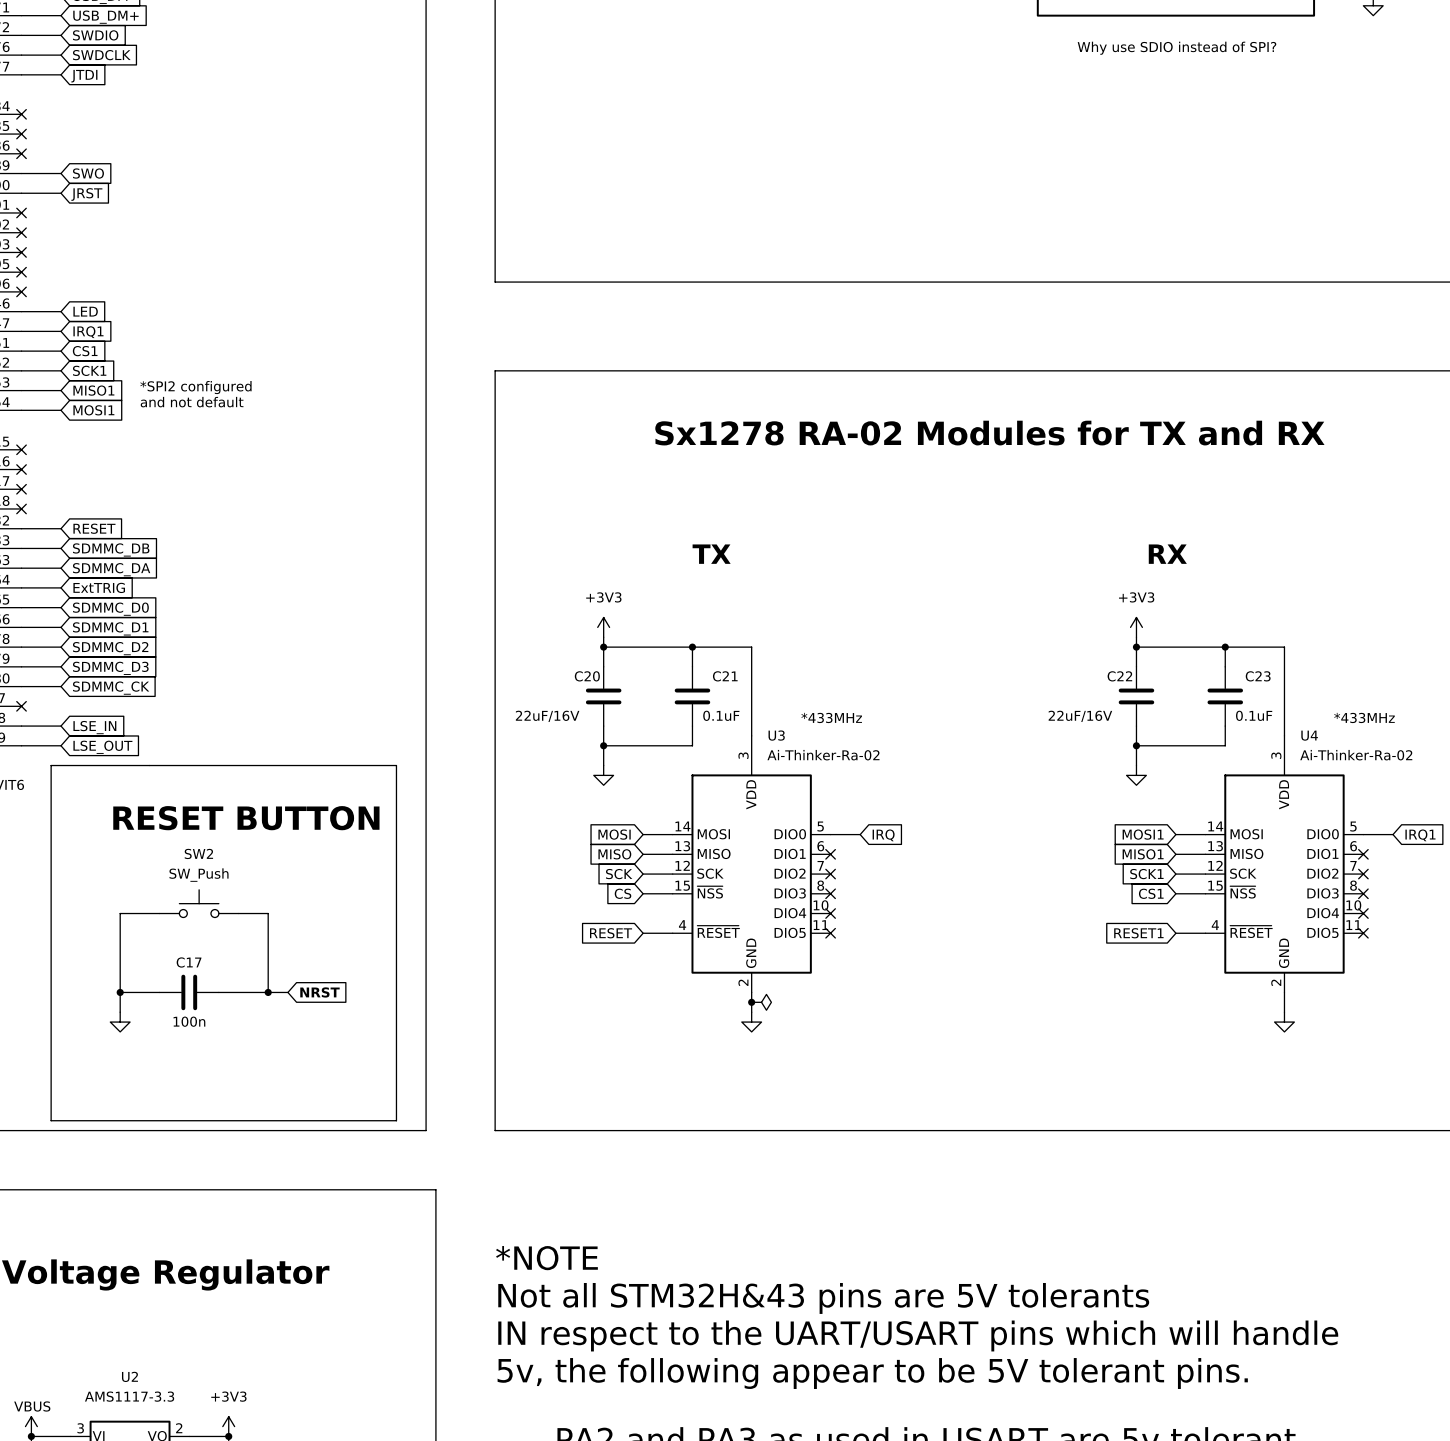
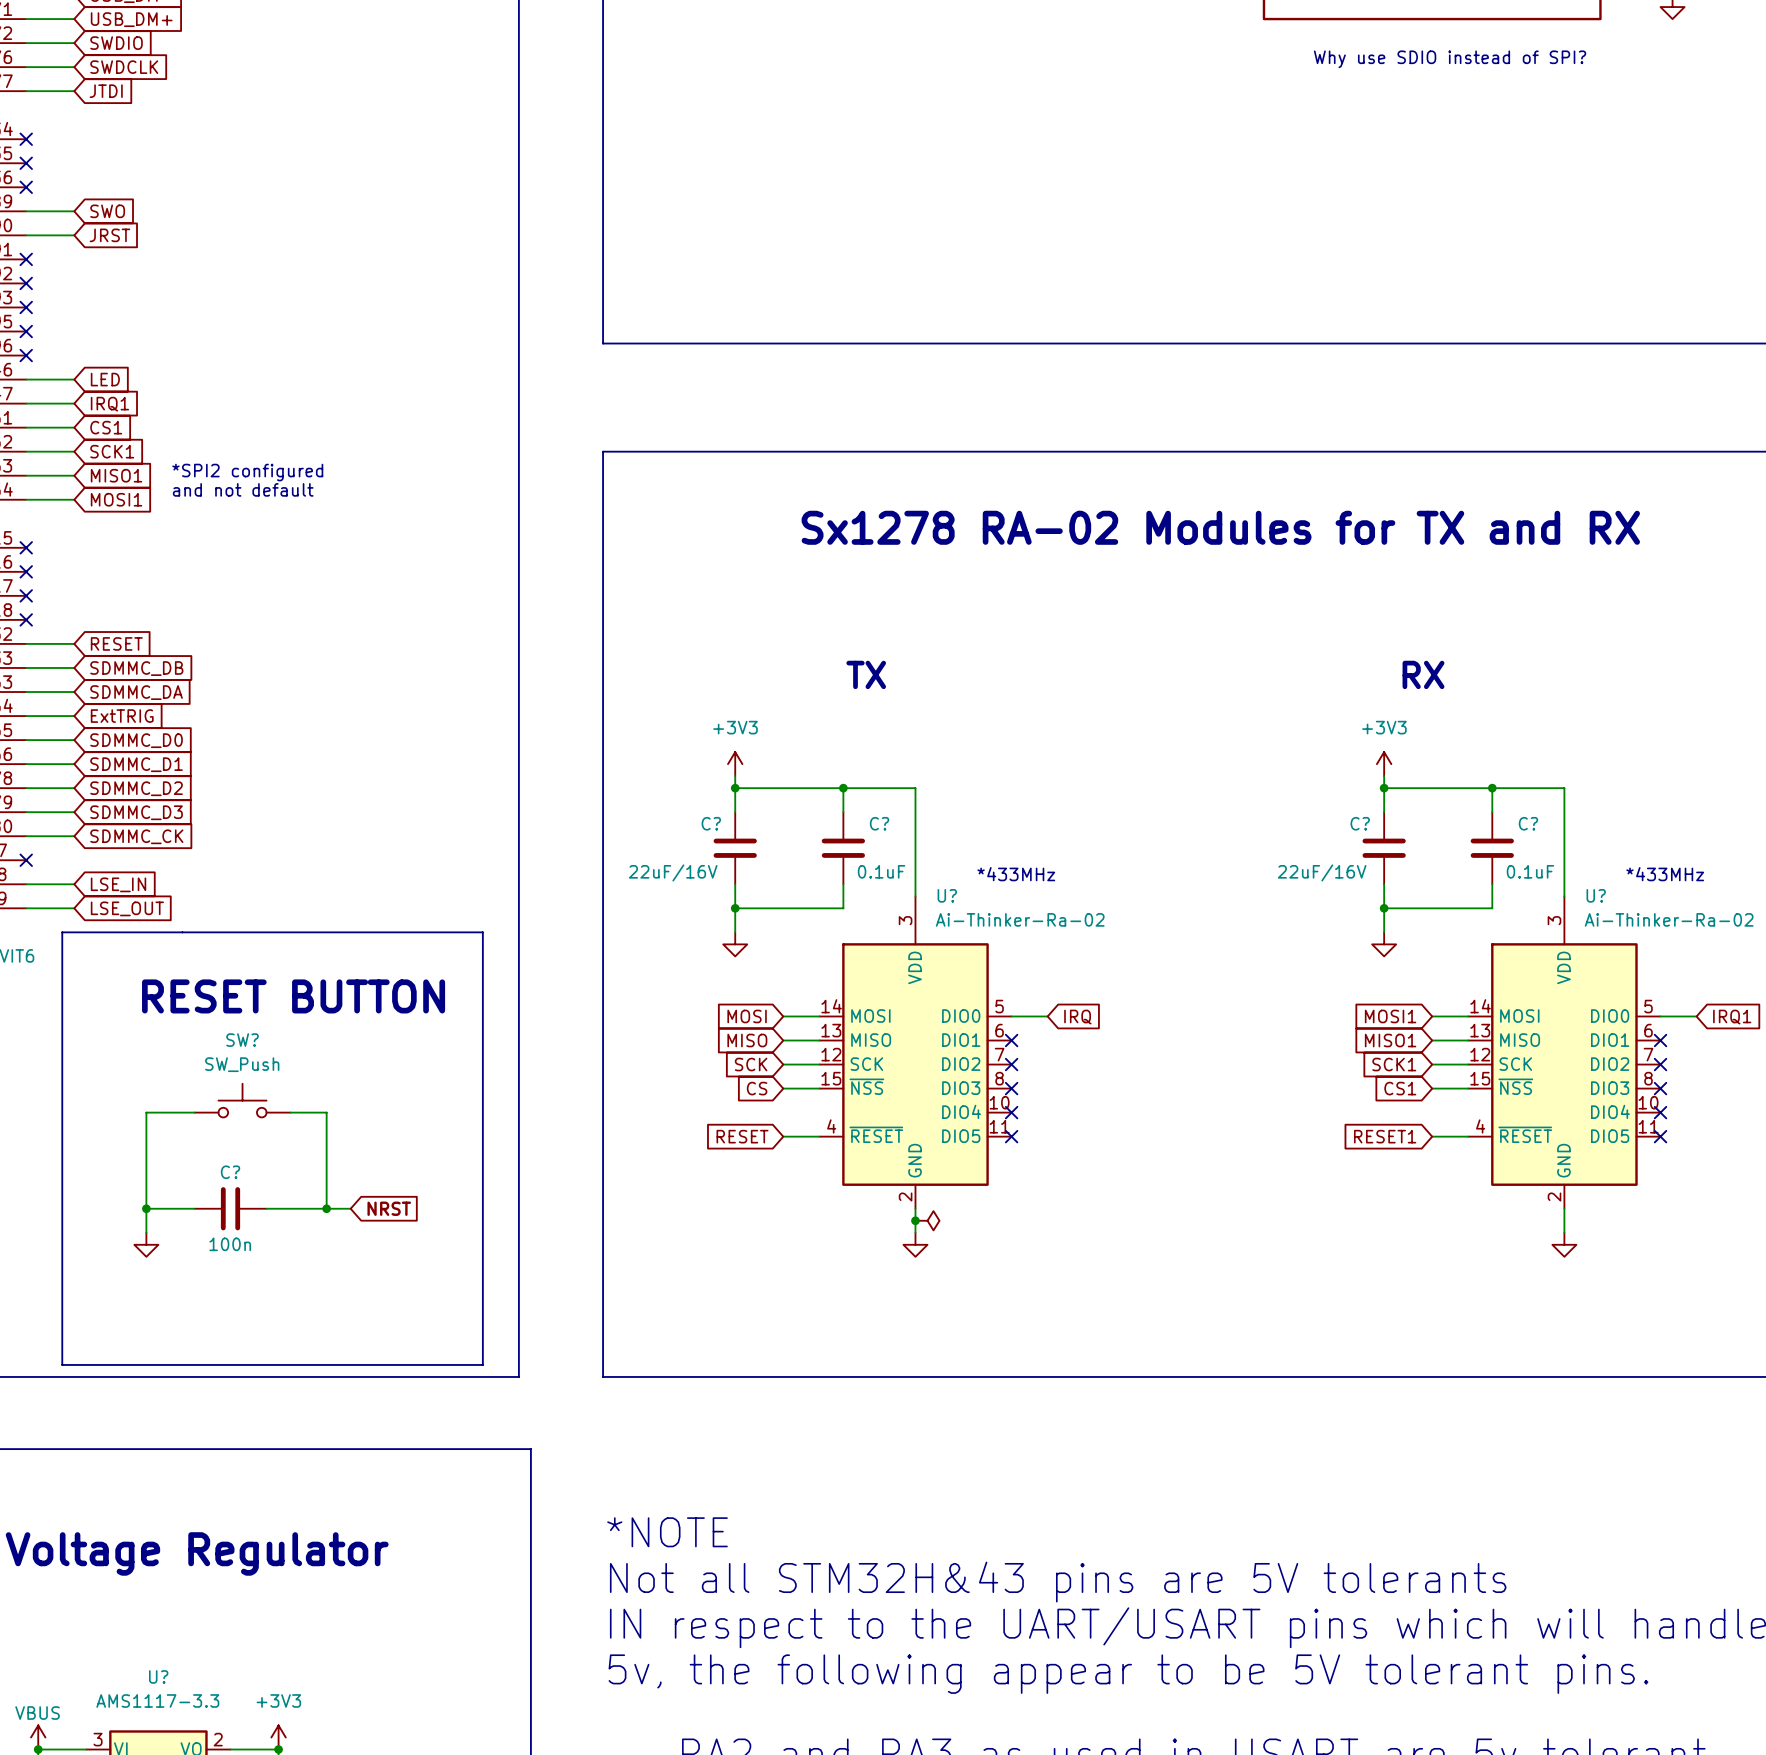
C20 name: C20 (587, 676) -> C? (711, 823)
C21 name: C21 (725, 676) -> C? (879, 823)
C22 name: C22 (1119, 676) -> C? (1360, 823)
C23 name: C23 (1258, 676) -> C? (1528, 823)
U3 name: U3 (776, 735) -> U? (947, 895)
U4 name: U4 (1309, 735) -> U? (1596, 895)
SW2 name: SW2 (198, 853) -> SW? (242, 1040)
C17 name: C17 (189, 962) -> C? (230, 1172)
U2 name: U2 (129, 1376) -> U? (158, 1676)

